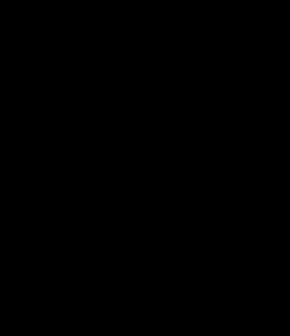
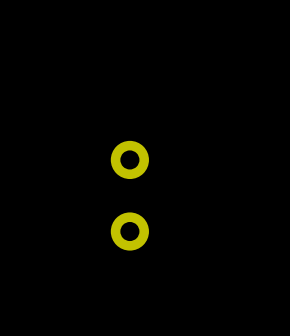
part: none -> (129, 195)

